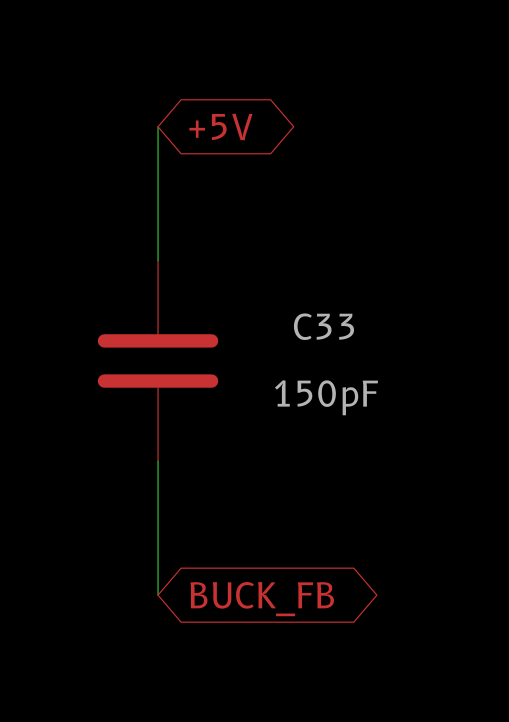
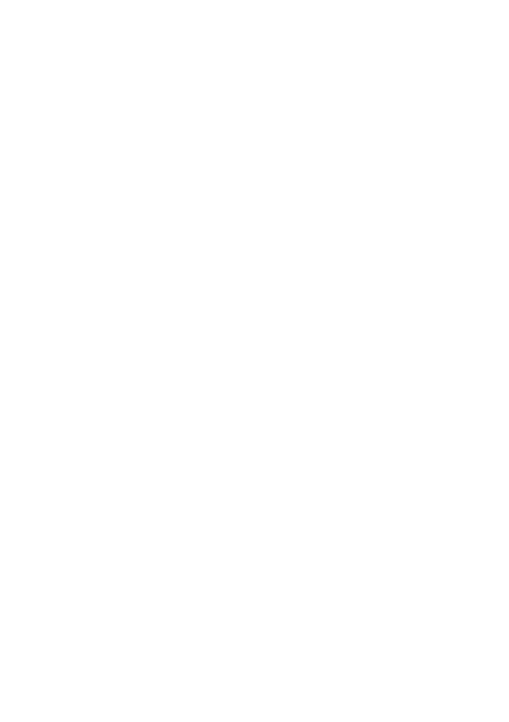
wire: (158, 126) (158, 260) -> none
global label: +5V (220, 126) -> none
C33: 150pF (158, 360) -> none
wire: (158, 461) (158, 595) -> none
global label: BUCK_FB (262, 599) -> none

